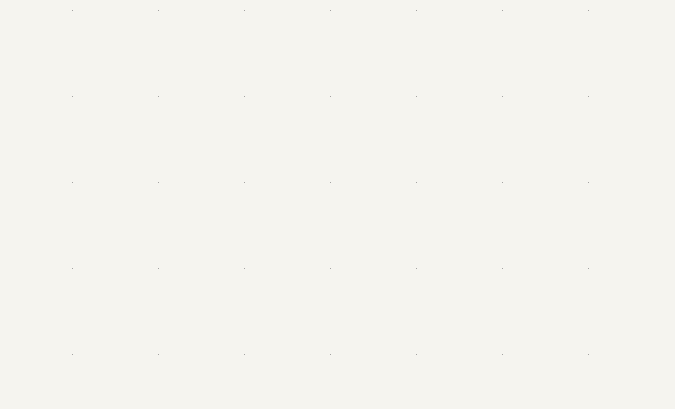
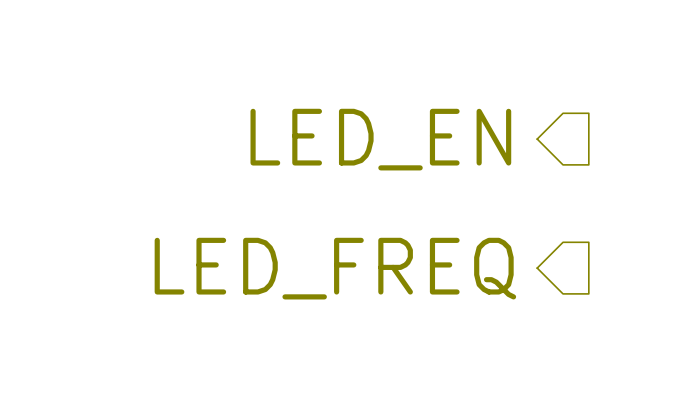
hierarchical label: none -> LED_EN (380, 139)
hierarchical label: none -> LED_FREQ (335, 268)

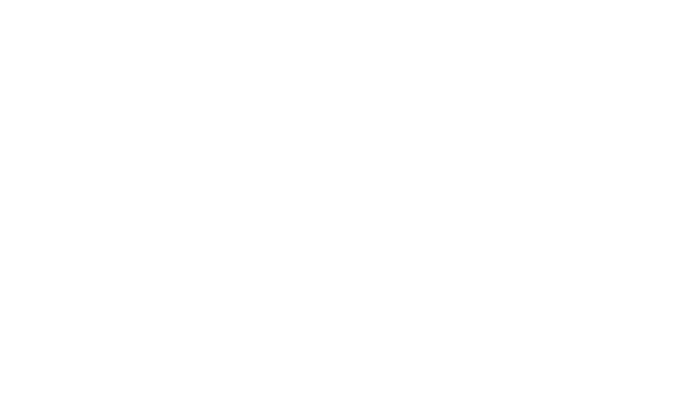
hierarchical label: LED_EN (380, 139) -> none
hierarchical label: LED_FREQ (335, 268) -> none

